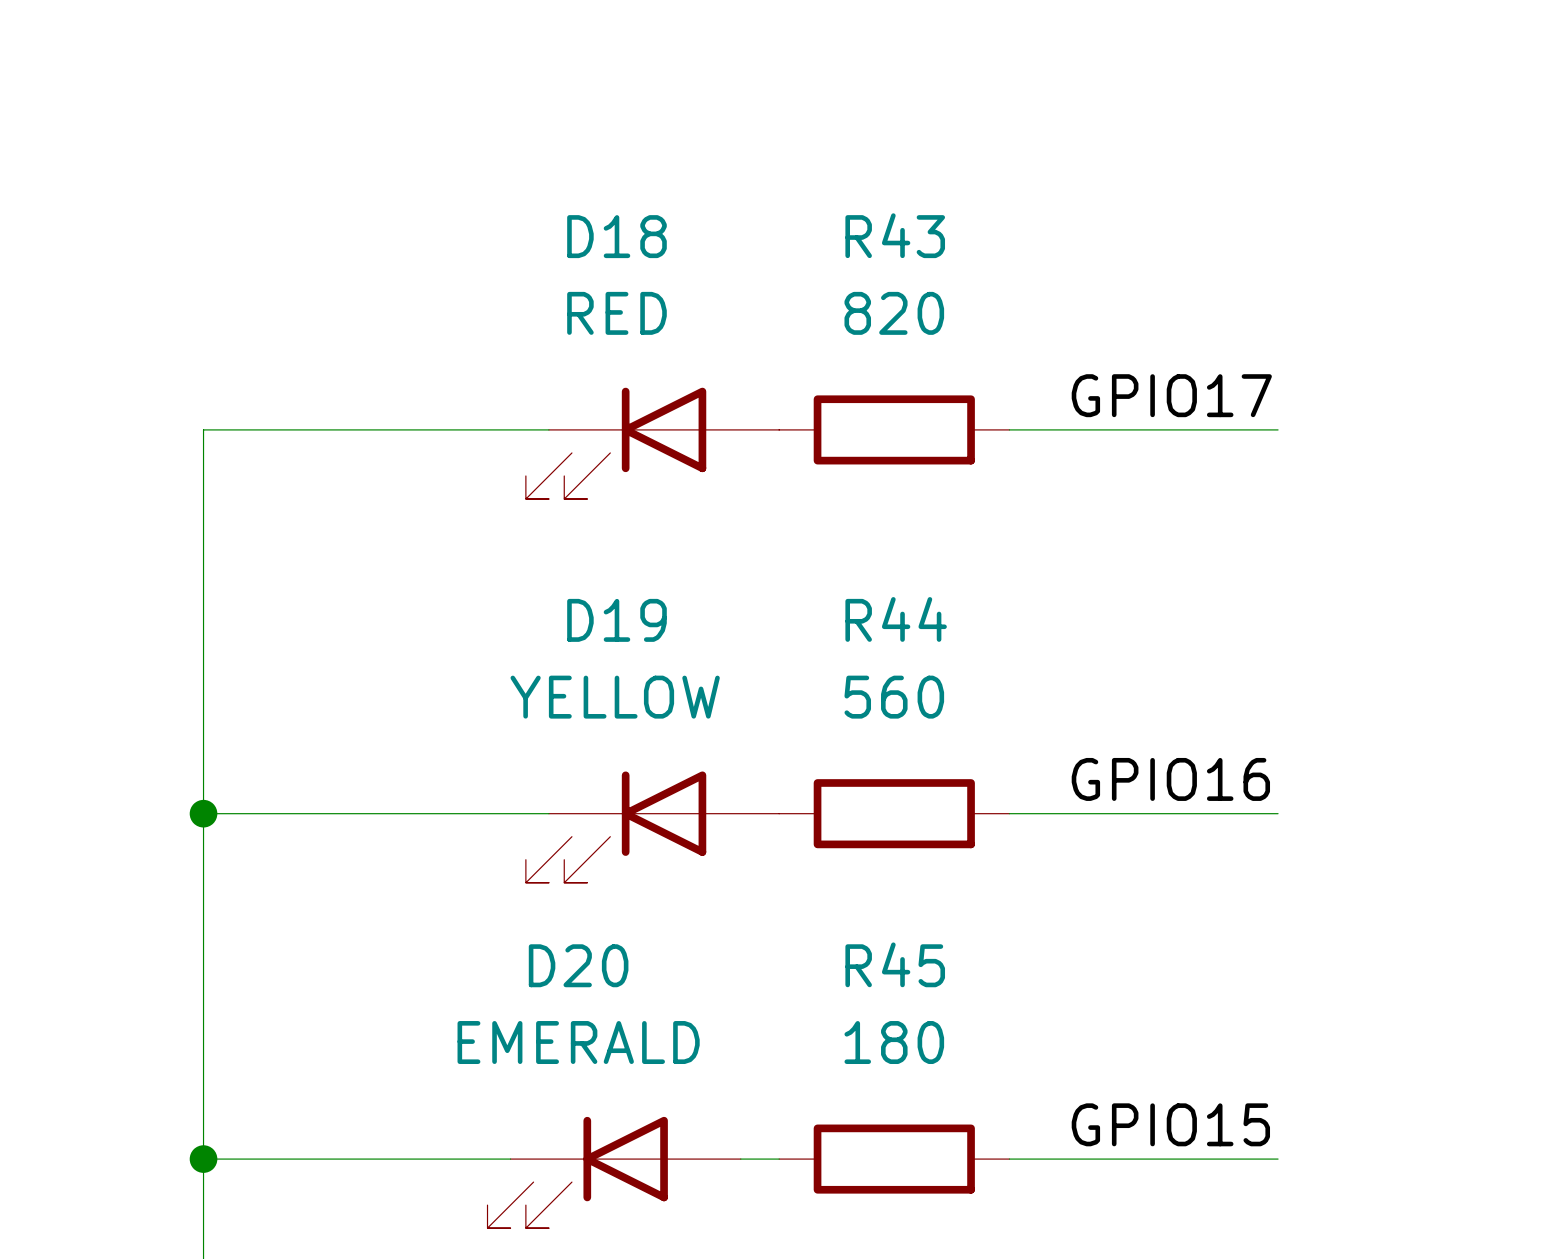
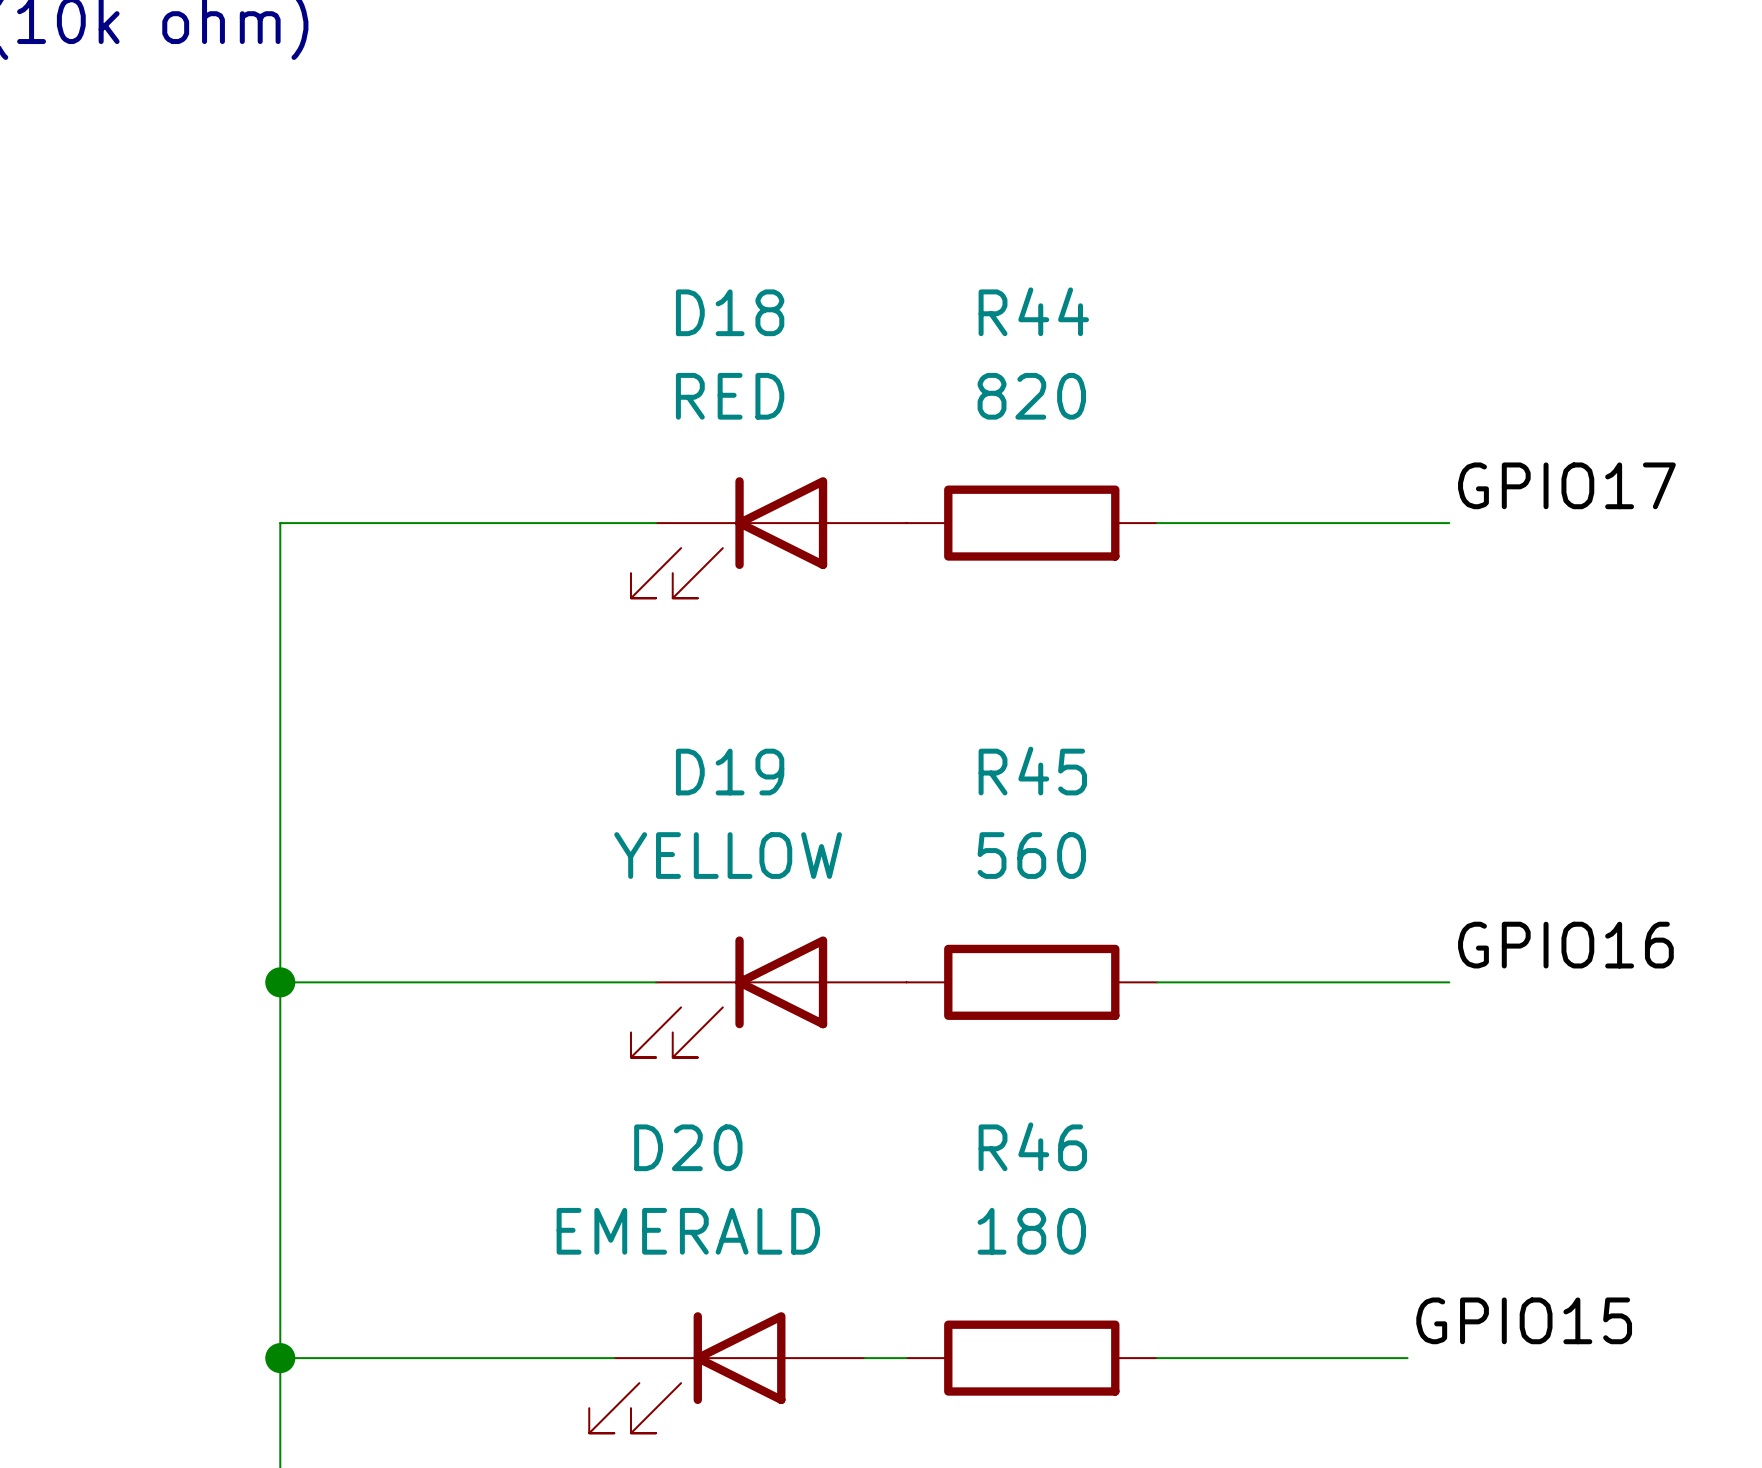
R44: none -> 820 (1031, 523)
label position: GPIO17 (1171, 395) -> GPIO17 (1566, 485)
wire: (203, 429) (548, 429) -> (280, 564) (280, 523) (656, 523)
R43: 820 (894, 429) -> none
wire: (1009, 429) (1278, 429) -> (1157, 523) (1449, 523)
D18 position: (652, 443) -> (768, 537)
R44 name: R44 (896, 619) -> R45 (1032, 771)
label position: GPIO16 (1170, 779) -> GPIO16 (1565, 945)
R45 name: R45 (895, 964) -> R46 (1032, 1146)
label position: GPIO15 (1170, 1124) -> GPIO15 (1524, 1320)
wire: (1239, 1159) (1278, 1159) -> none

